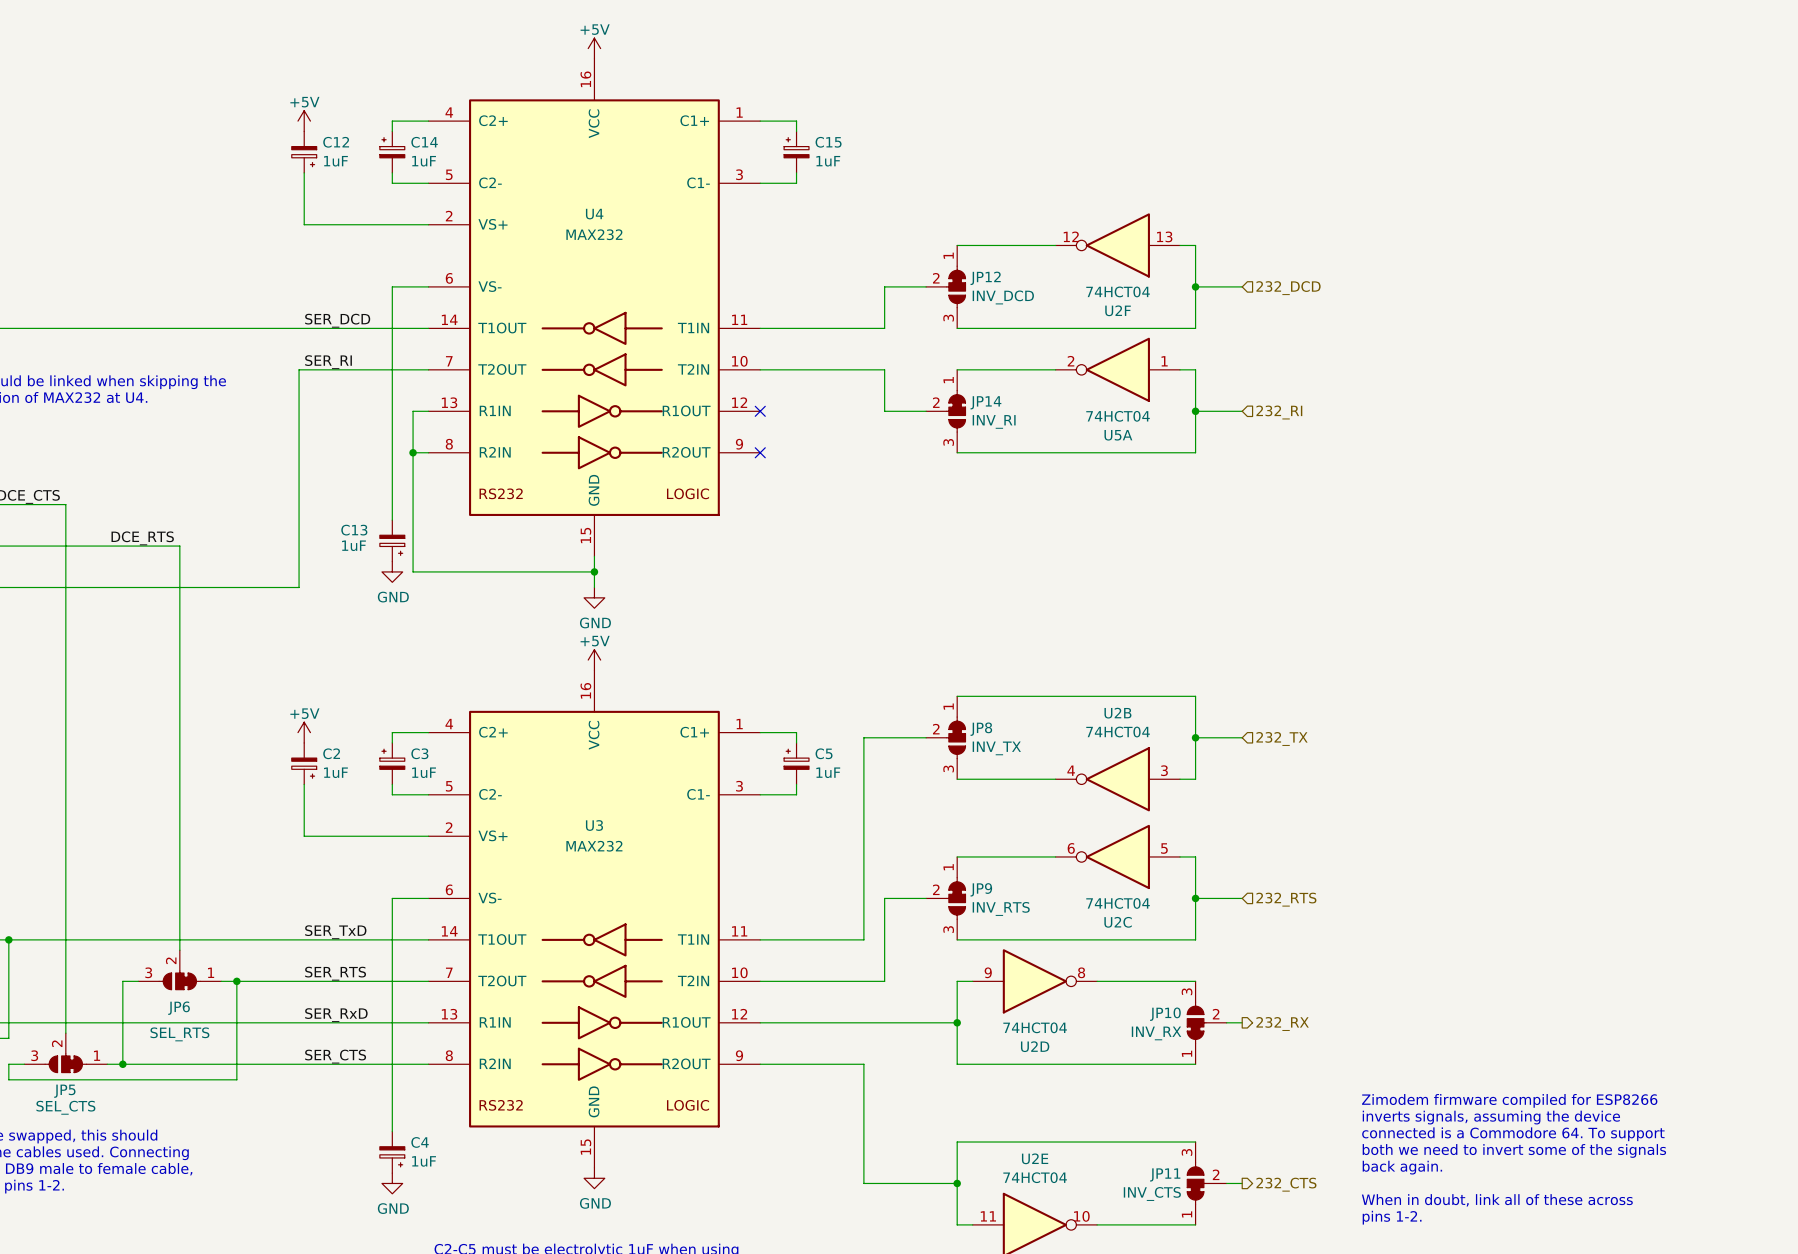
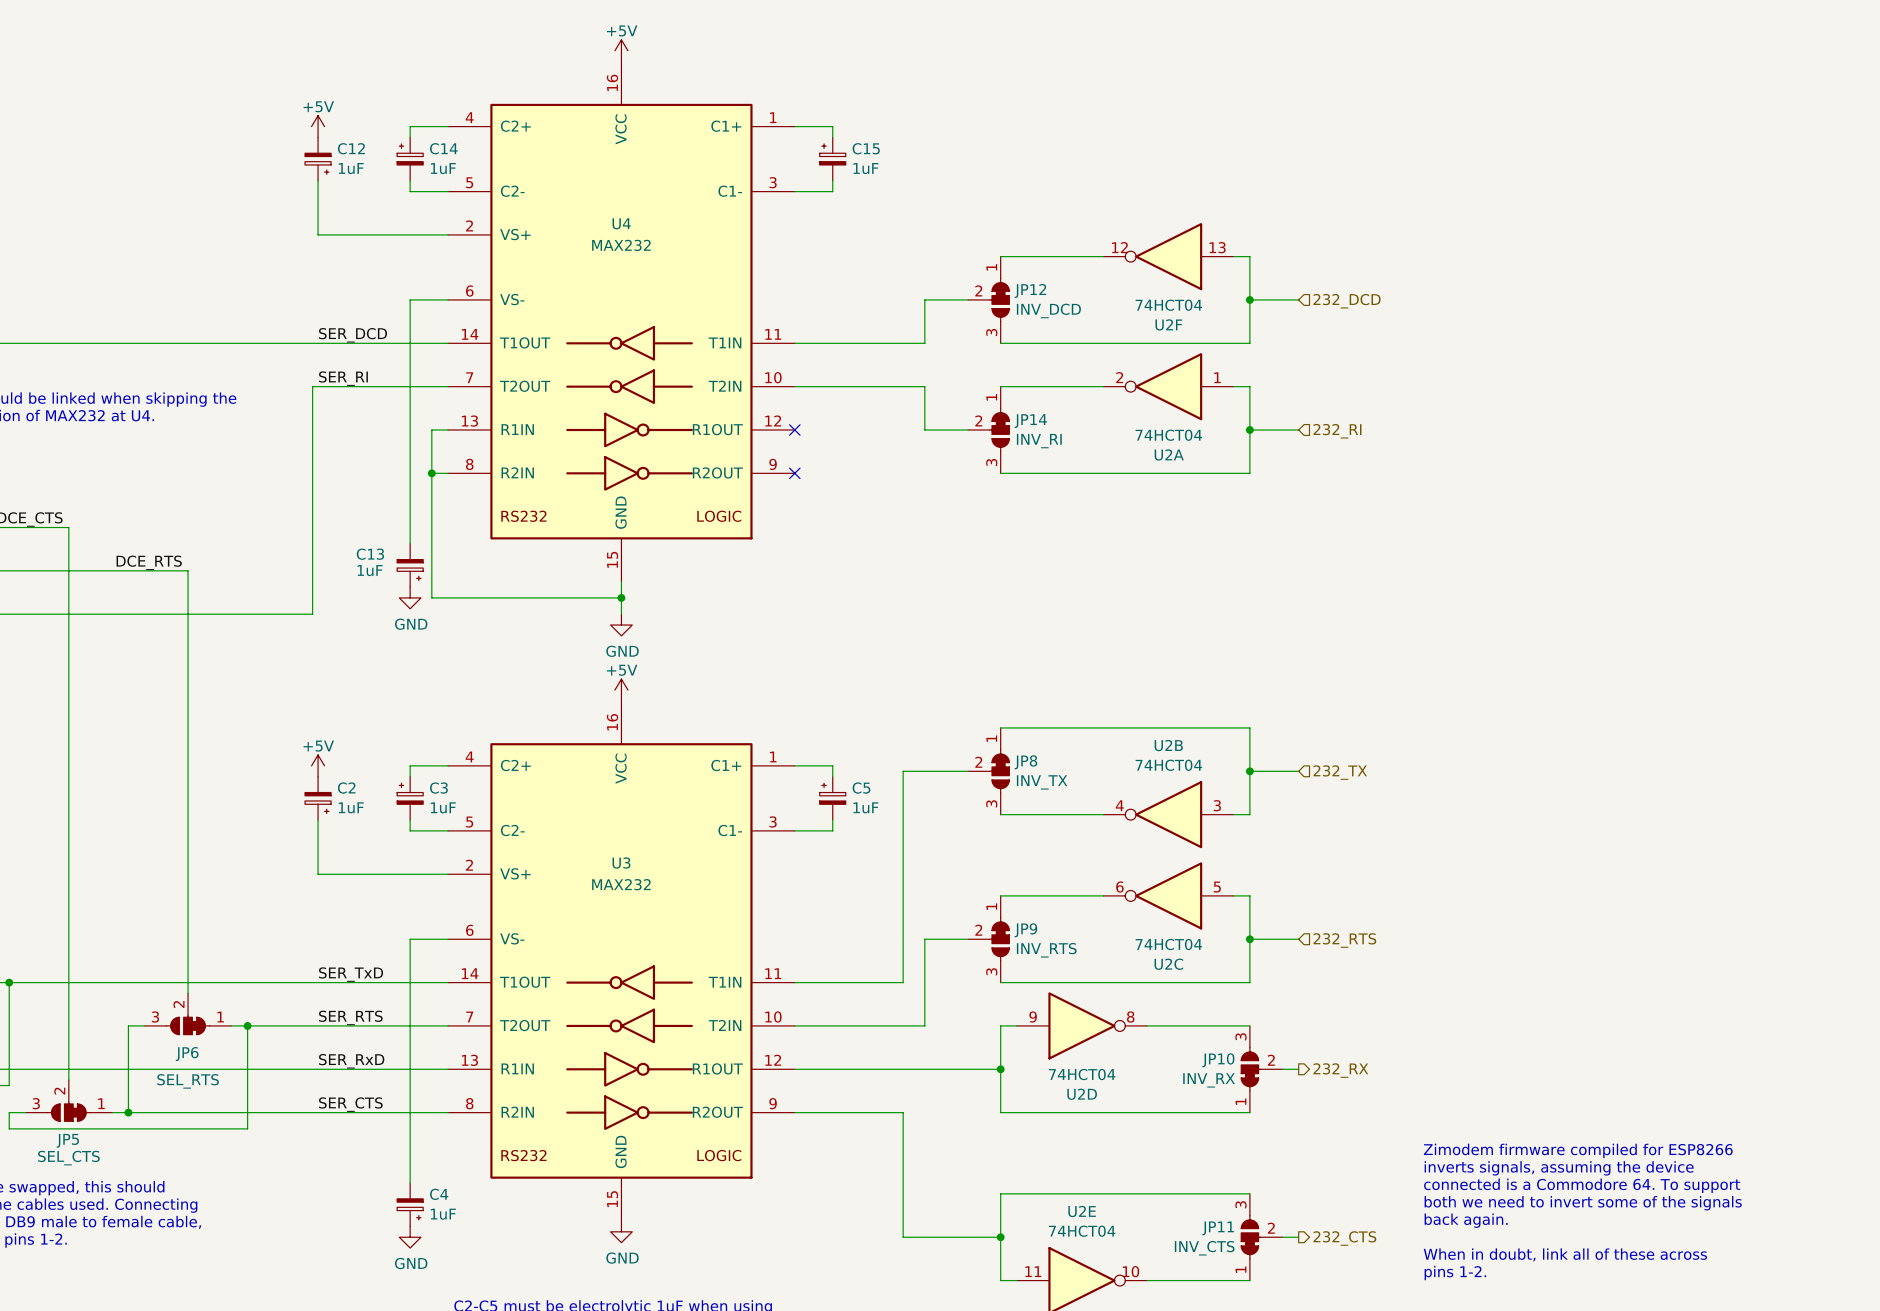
U5A name: U5A (1118, 435) -> U2A (1169, 454)

